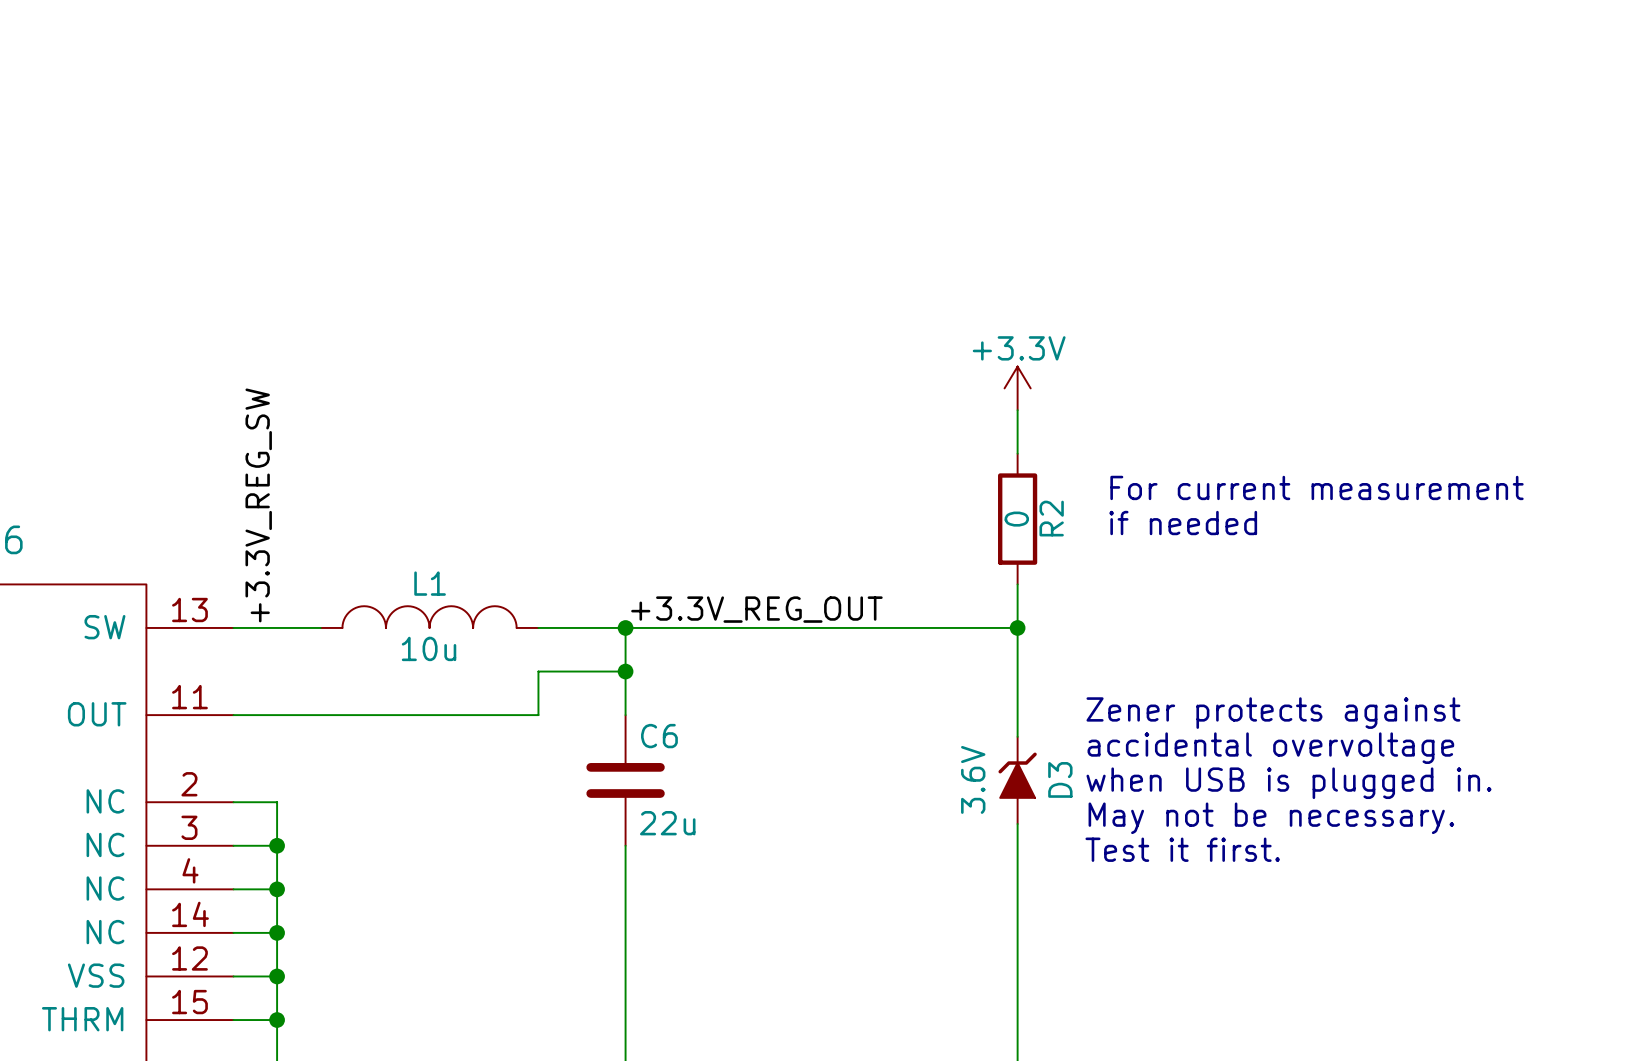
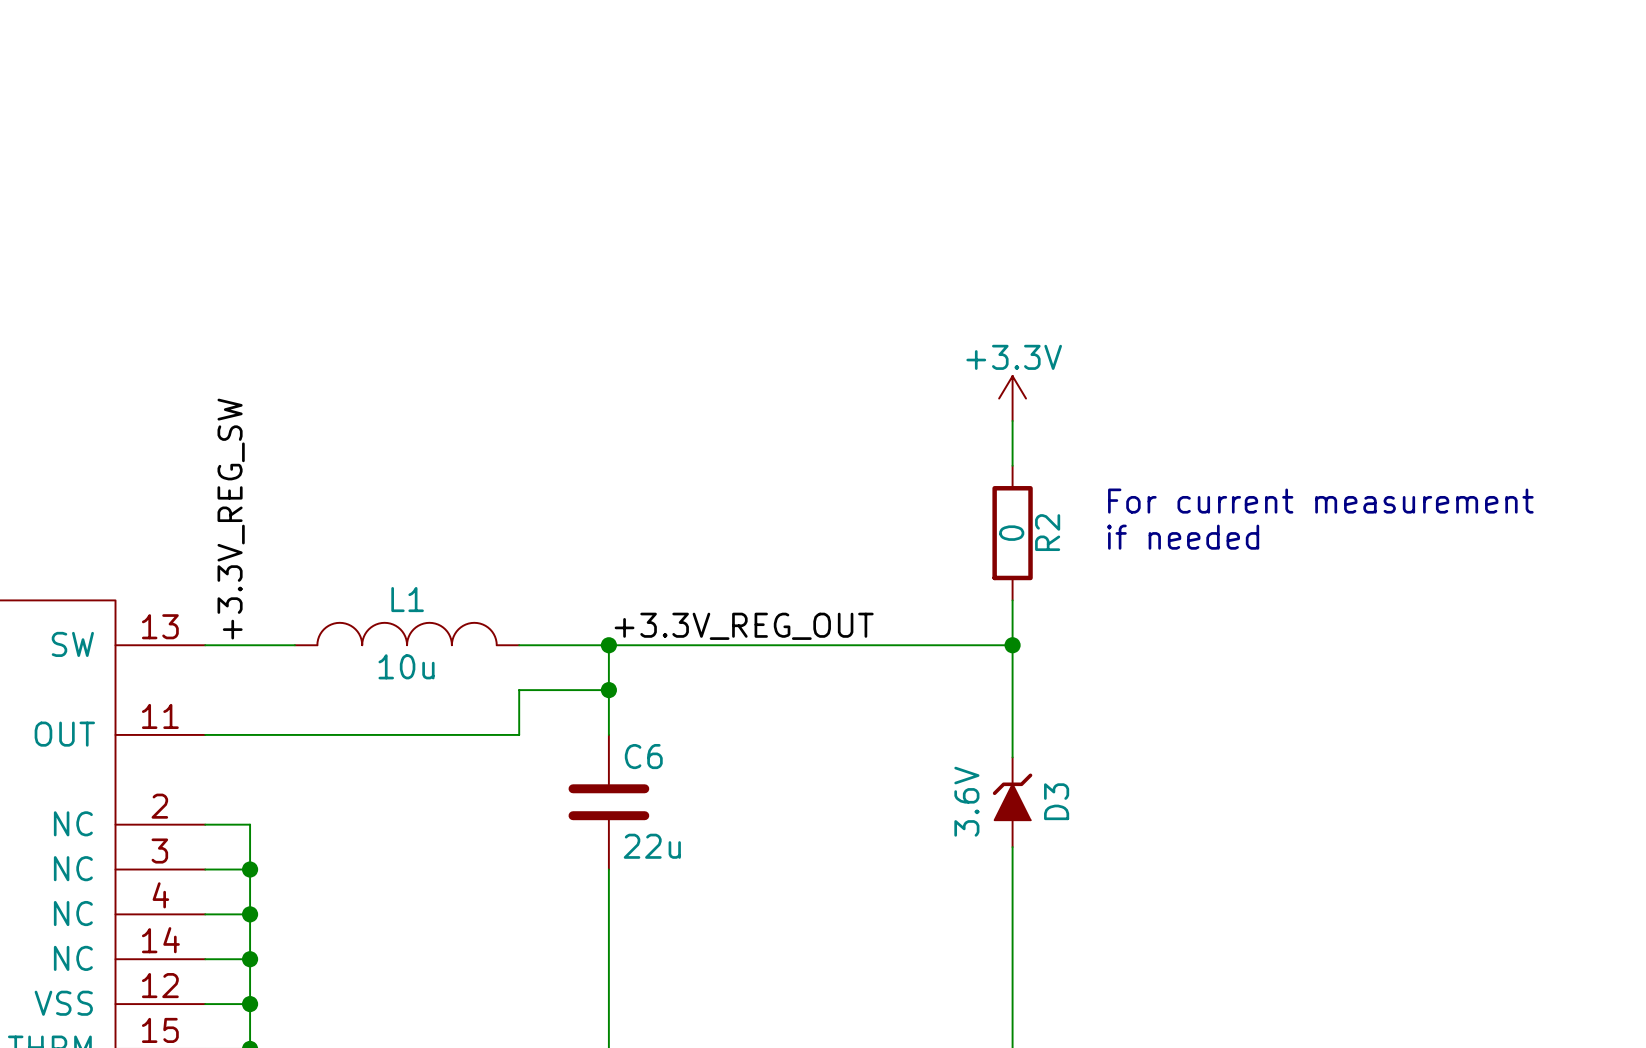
text: Zener protects against (1273, 713) -> none
text: accidental overvoltage (1270, 748) -> none
text: when USB is plugged in. (1288, 783) -> none
text: May not be necessary. (1271, 818) -> none
text: Test it first. (1182, 849) -> none

